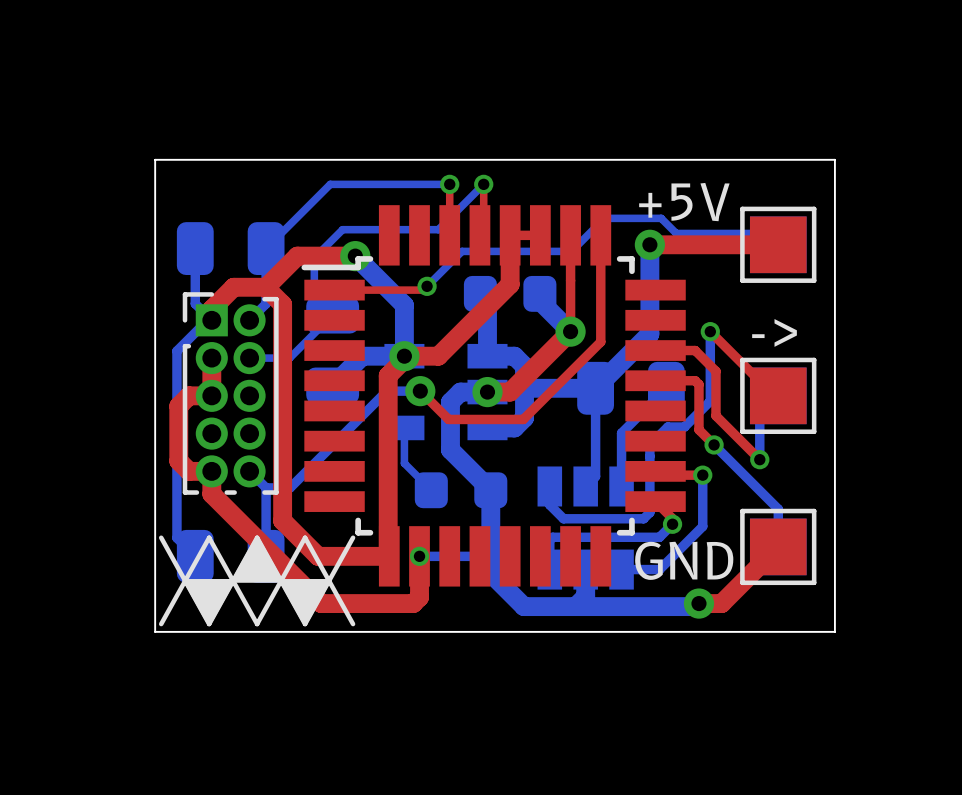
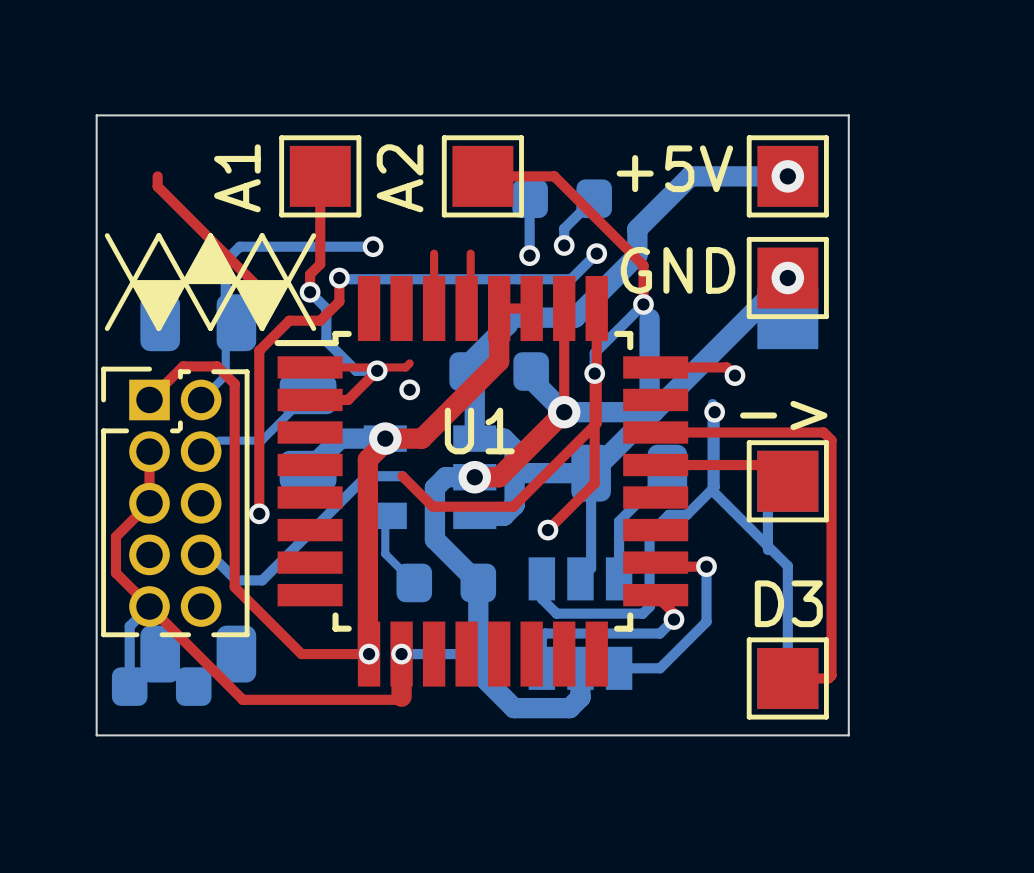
top track: none -> (484, 175) (482, 176) (554, 176) (643, 265) (643, 304)
top track: none -> (157, 176) (157, 186) (273, 302)
top track: none -> (320, 176) (320, 264) (310, 274) (310, 292)
part: none -> (320, 176)
part: none -> (482, 176)
bottom track: none -> (787, 176) (690, 176) (637, 229) (637, 255) (575, 317) (512, 317) (507, 324) (461, 371)
part: none -> (787, 176)
via: none -> (787, 176)
text: none -> A1 (237, 178)
text: none -> A2 (400, 178)
bottom track: none -> (529, 199) (529, 255)
part: none -> (562, 198)
bottom track: none -> (594, 198) (564, 228) (564, 245)
board edge: (834, 159) (155, 159) (155, 631) -> (848, 227) (848, 115) (96, 115) (96, 735) (116, 735)
via: none -> (564, 245)
bottom track: none -> (373, 246) (239, 246) (225, 260) (225, 375) (201, 399)
via: none -> (373, 246)
bottom track: (449, 184) (330, 184) (266, 248) (266, 303) (249, 320) -> none
via: (449, 184) -> none
bottom track: (483, 184) (438, 229) (342, 229) (314, 257) (314, 296) (332, 315) -> none
via: (483, 184) -> none
bottom track: none -> (596, 253) (571, 279) (339, 278)
via: none -> (596, 253)
via: none -> (529, 255)
text position: +5V (684, 202) -> +5V (674, 168)
top track: none -> (339, 278) (339, 301) (320, 320) (289, 320) (259, 350) (259, 513)
via: none -> (339, 278)
bottom track: none -> (787, 278) (653, 412) (564, 412)
via: none -> (787, 278)
bottom track: none -> (310, 292) (326, 308) (326, 341) (356, 370) (377, 370)
via: none -> (310, 292)
via size: [634, 229, 665, 260] -> [633, 294, 654, 315]
bottom track: none -> (643, 304) (594, 353) (594, 373)
top track: (649, 244) (778, 244) -> none
bottom track: (778, 244) (766, 233) (676, 233) (661, 218) (604, 218) (571, 251) (462, 251) (427, 286) -> none
part position: (778, 244) -> (787, 278)
bottom track: (195, 248) (195, 303) (211, 320) (207, 320) (176, 351) (176, 538) (195, 556) -> none
top track: (355, 256) (297, 256) (266, 287) (233, 287) (211, 309) (211, 320) -> none
bottom track: (355, 256) (404, 305) (404, 354) -> none
via: (355, 256) -> none
via: (427, 286) -> none
top track: (265, 287) (282, 304) (282, 520) (318, 556) (326, 556) -> (149, 399) (183, 366) (217, 366) (234, 383) (234, 587) (301, 654)
top track: none -> (655, 367) (726, 367) (734, 375)
part footprint: [182, 292, 279, 495] -> [101, 366, 250, 638]
top track: none -> (377, 370) (348, 399) (310, 399)
via: none -> (377, 370)
top track: none -> (594, 373) (594, 483) (547, 530)
via: none -> (594, 373)
via: none -> (734, 375)
via: none -> (409, 389)
top track: (710, 331) (774, 395) (778, 395) -> (698, 465) (771, 465) (787, 481)
U1 name: none -> U1 (479, 430)
top track: (695, 350) (715, 371) (715, 415) (759, 459) -> (698, 432) (823, 432) (831, 440) (831, 675) (828, 678) (787, 678)
top track: (211, 358) (211, 395) (189, 395) (178, 406) (178, 461) (189, 471) (211, 471) (211, 494) (321, 603) (413, 603) (419, 596) -> (149, 451) (149, 503) (115, 536) (115, 572) (242, 699) (398, 699) (401, 696)
top track: (695, 380) (698, 384) (698, 429) (714, 444) -> none
via: (420, 391) -> none
via: none -> (259, 513)
via: none -> (547, 530)
bottom track: (714, 444) (778, 509) -> (712, 404) (712, 490) (787, 566) (787, 603)
via: (714, 444) -> none
via: (759, 459) -> none
bottom track: (266, 487) (266, 556) -> none
text: none -> D3 (788, 603)
bottom track: none -> (149, 606) (129, 626) (129, 686)
top track: (778, 546) (721, 603) (698, 603) -> none
part position: (778, 546) -> (787, 678)
top track width: thick (326, 556) (389, 556) -> thin (301, 654) (369, 654)
via: none -> (369, 654)
text position: GND (684, 560) -> GND (678, 270)
drawing position: (257, 580) -> (210, 282)
part: none -> (161, 686)
bottom track: (698, 603) (695, 606) (575, 606) -> none
via: (698, 603) -> none

